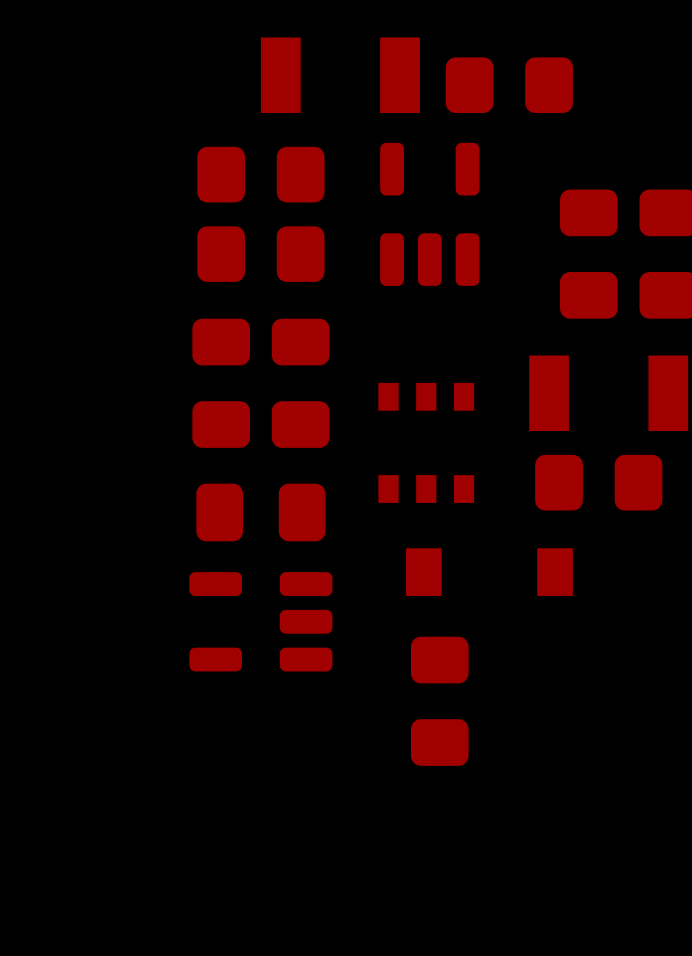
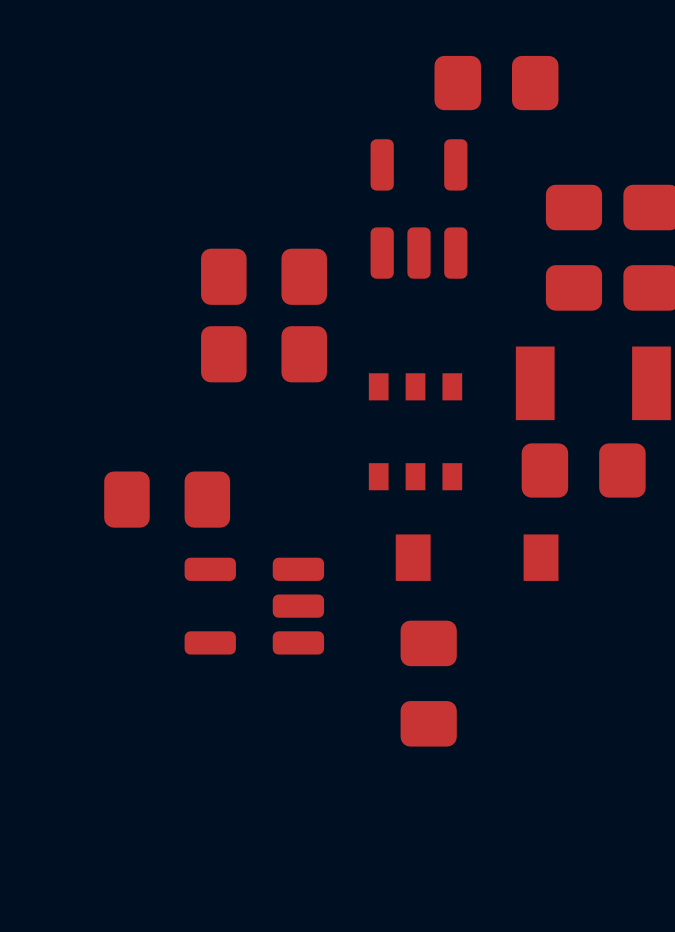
part: (340, 75) -> none
part: (260, 174) -> none
part footprint: [197, 226, 325, 282] -> [201, 248, 327, 305]
part: none -> (264, 354)
part: (221, 383) -> none
part: (300, 383) -> none
part: none -> (167, 499)
part: (260, 512) -> none

